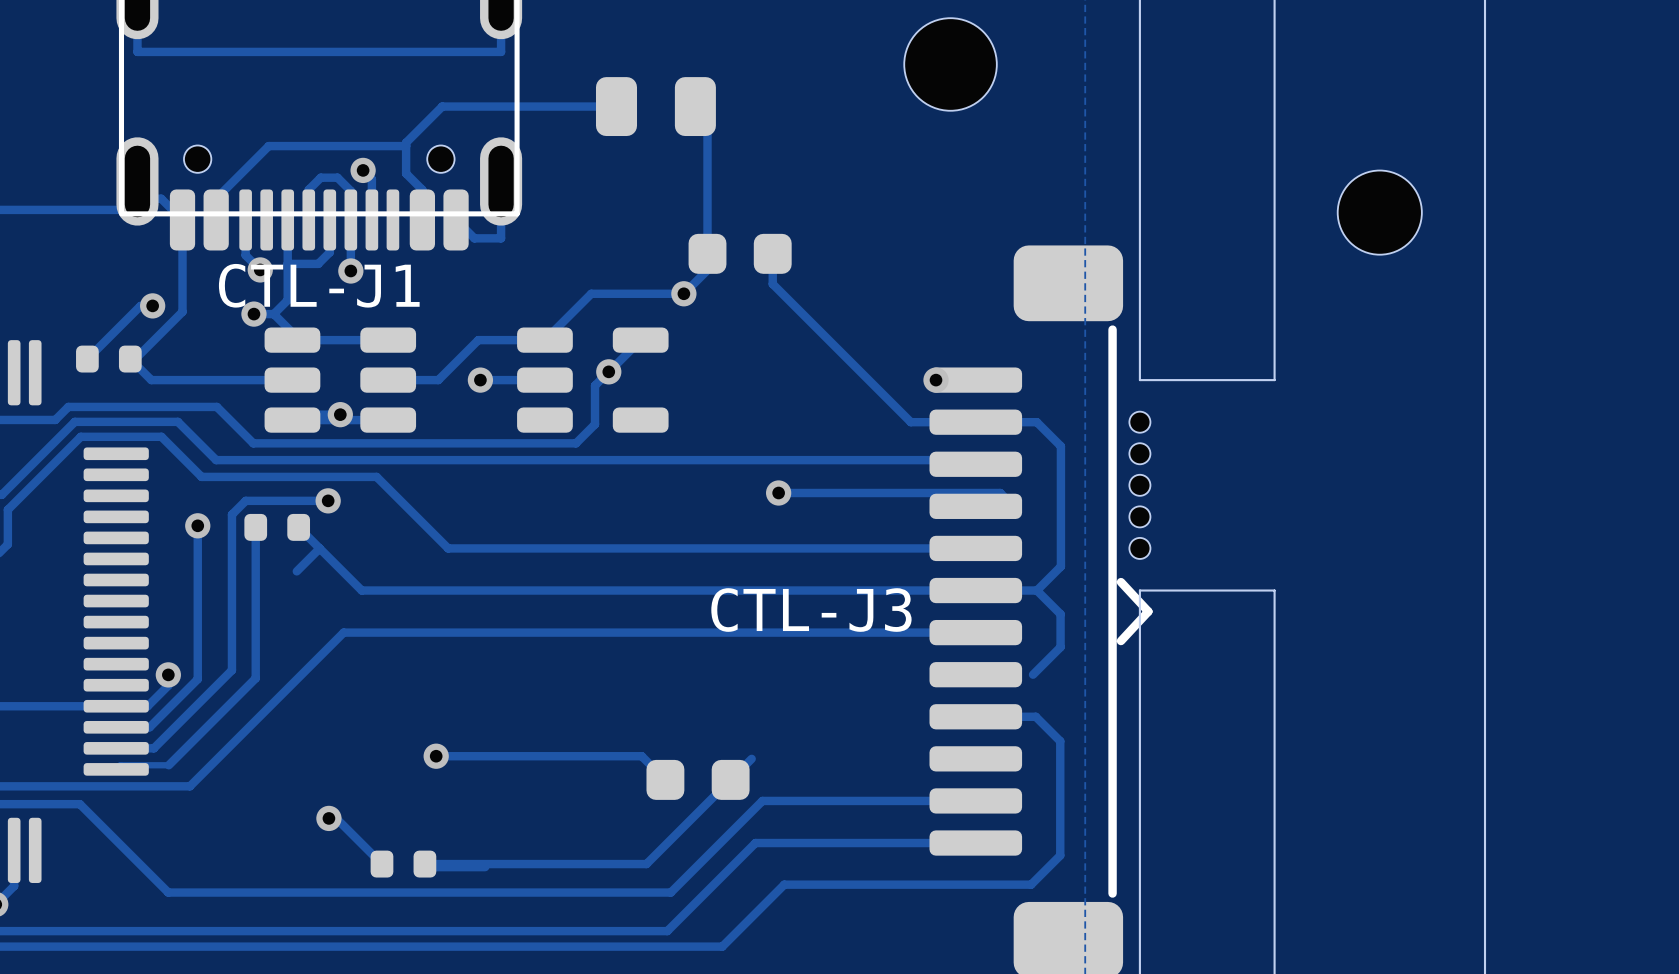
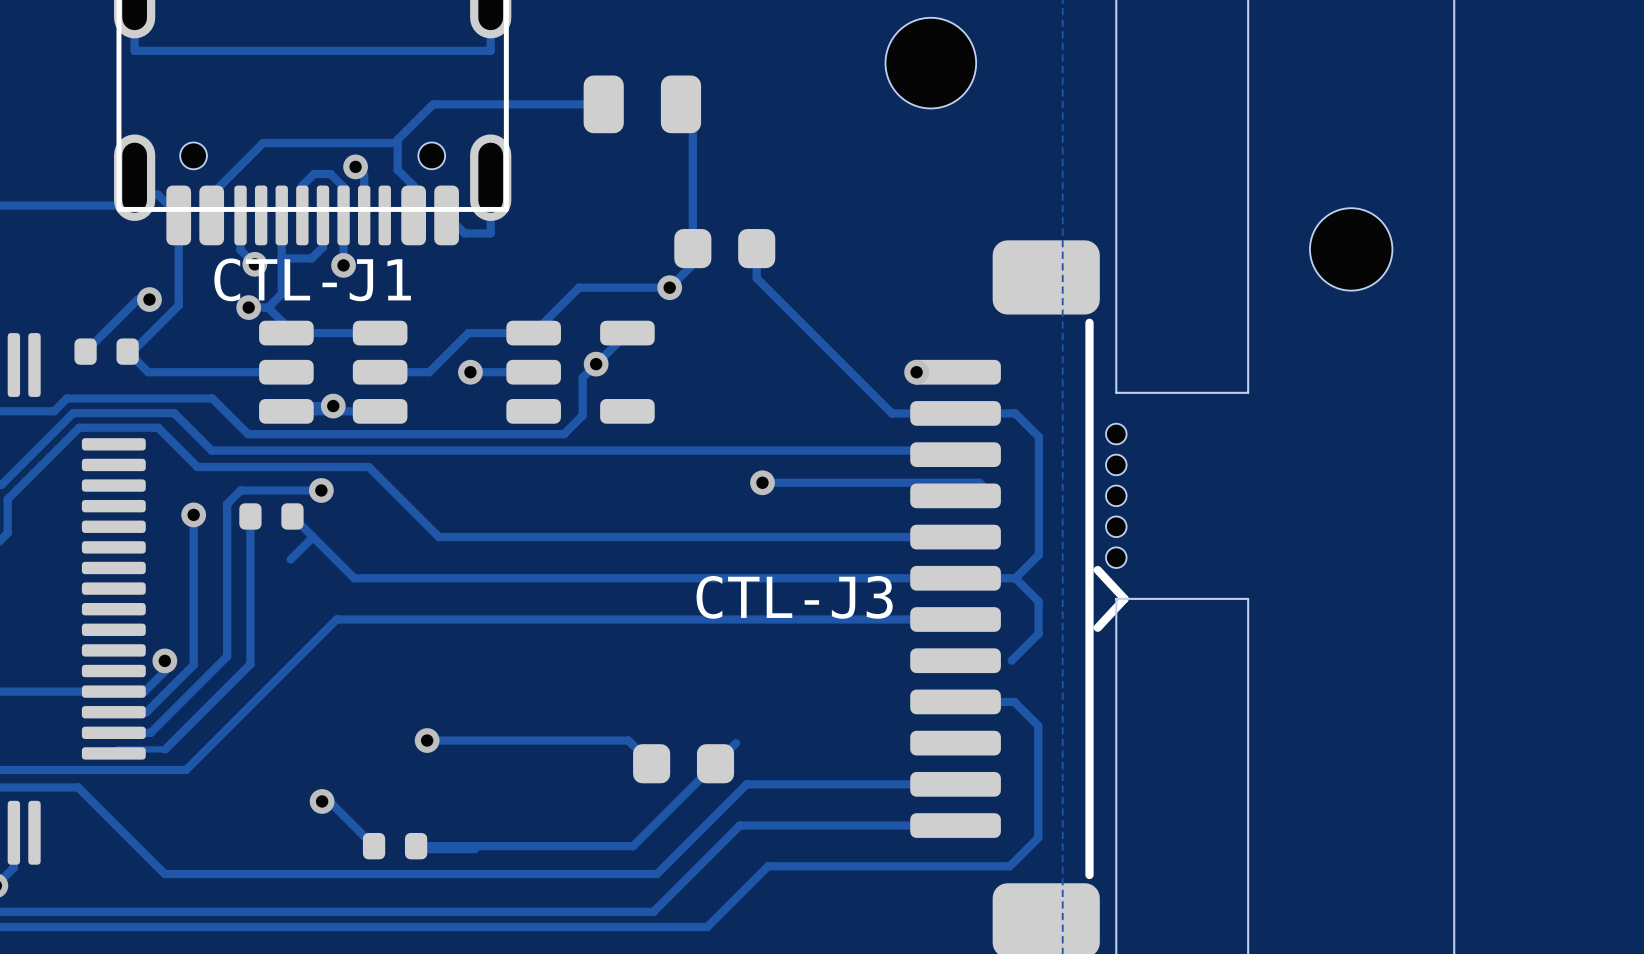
part position: (1379, 212) -> (1351, 249)
board edge: (1139, 380) (1274, 380) -> (1116, 372) (1116, 392) (1248, 392) (1248, 372)
part: (1139, 422) -> none
part: none -> (1116, 434)
part: (1139, 453) -> none
part: none -> (1116, 464)
part: (1139, 485) -> none
part: none -> (1116, 495)
part: (1139, 516) -> none
part: none -> (1116, 526)
part: (1139, 548) -> none
part: none -> (1116, 557)
board edge: (1139, 611) (1139, 590) (1274, 590) (1274, 611) -> (1116, 598) (1248, 598)

